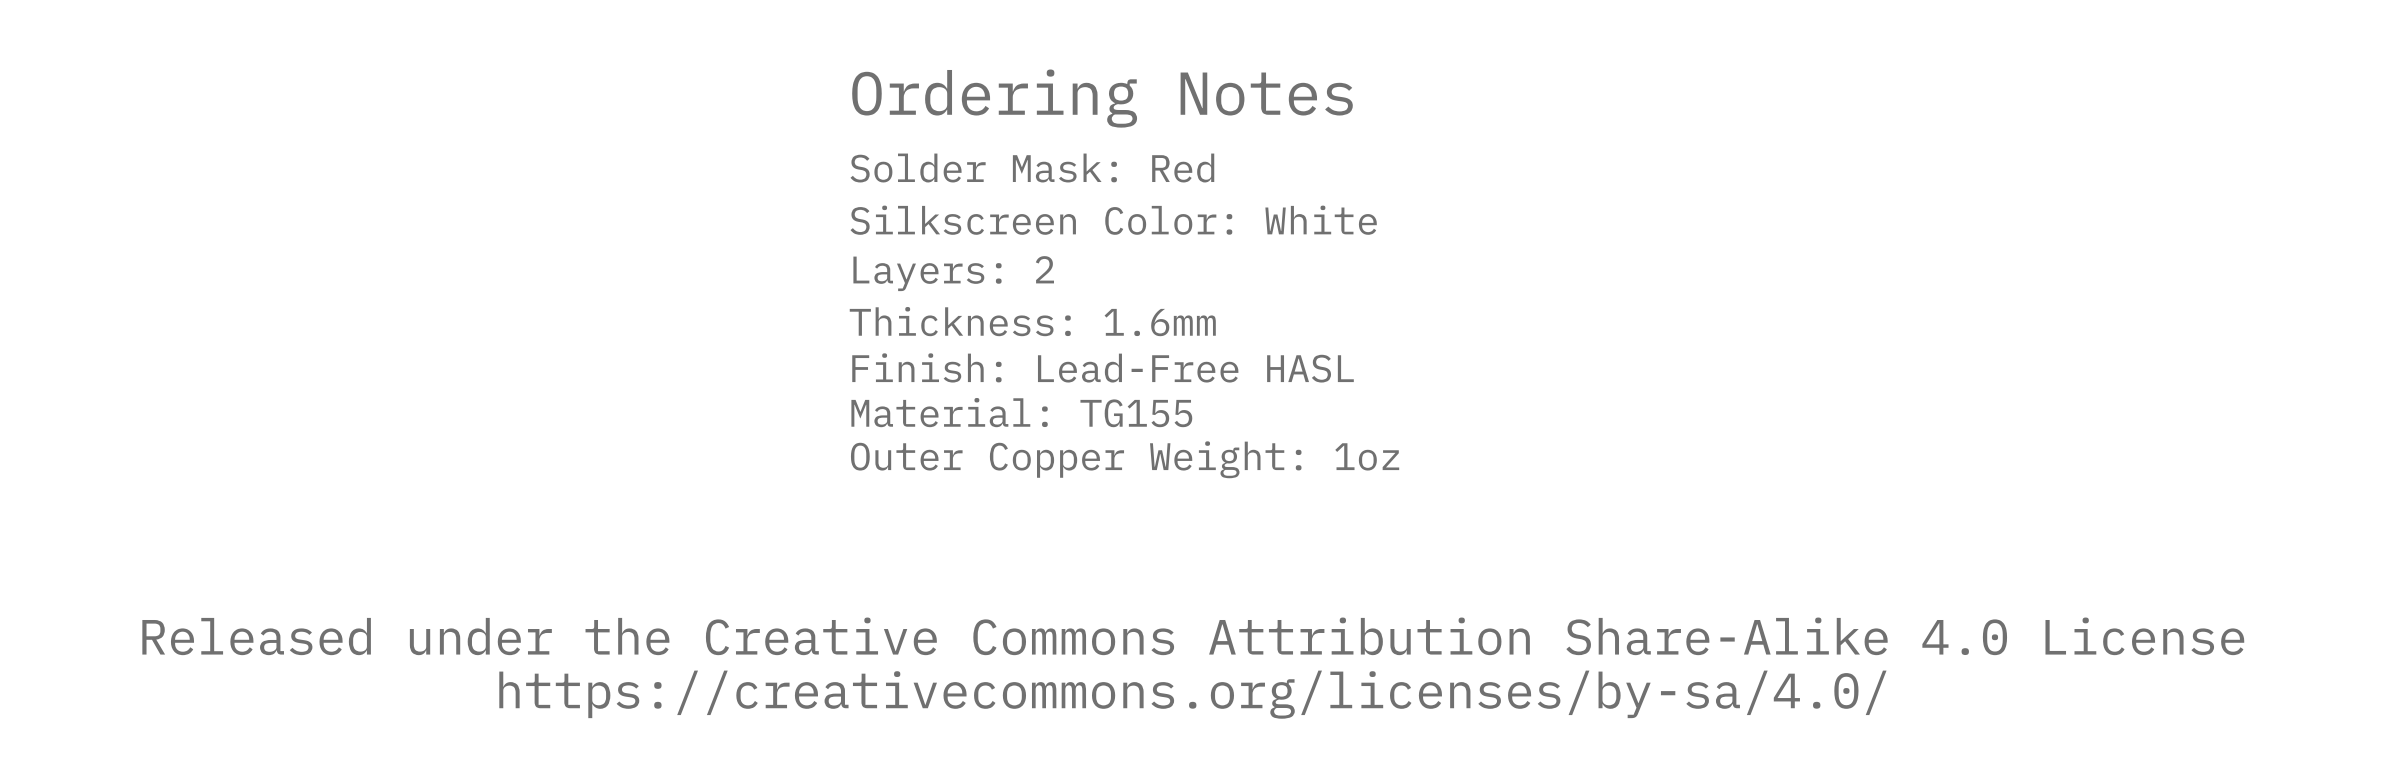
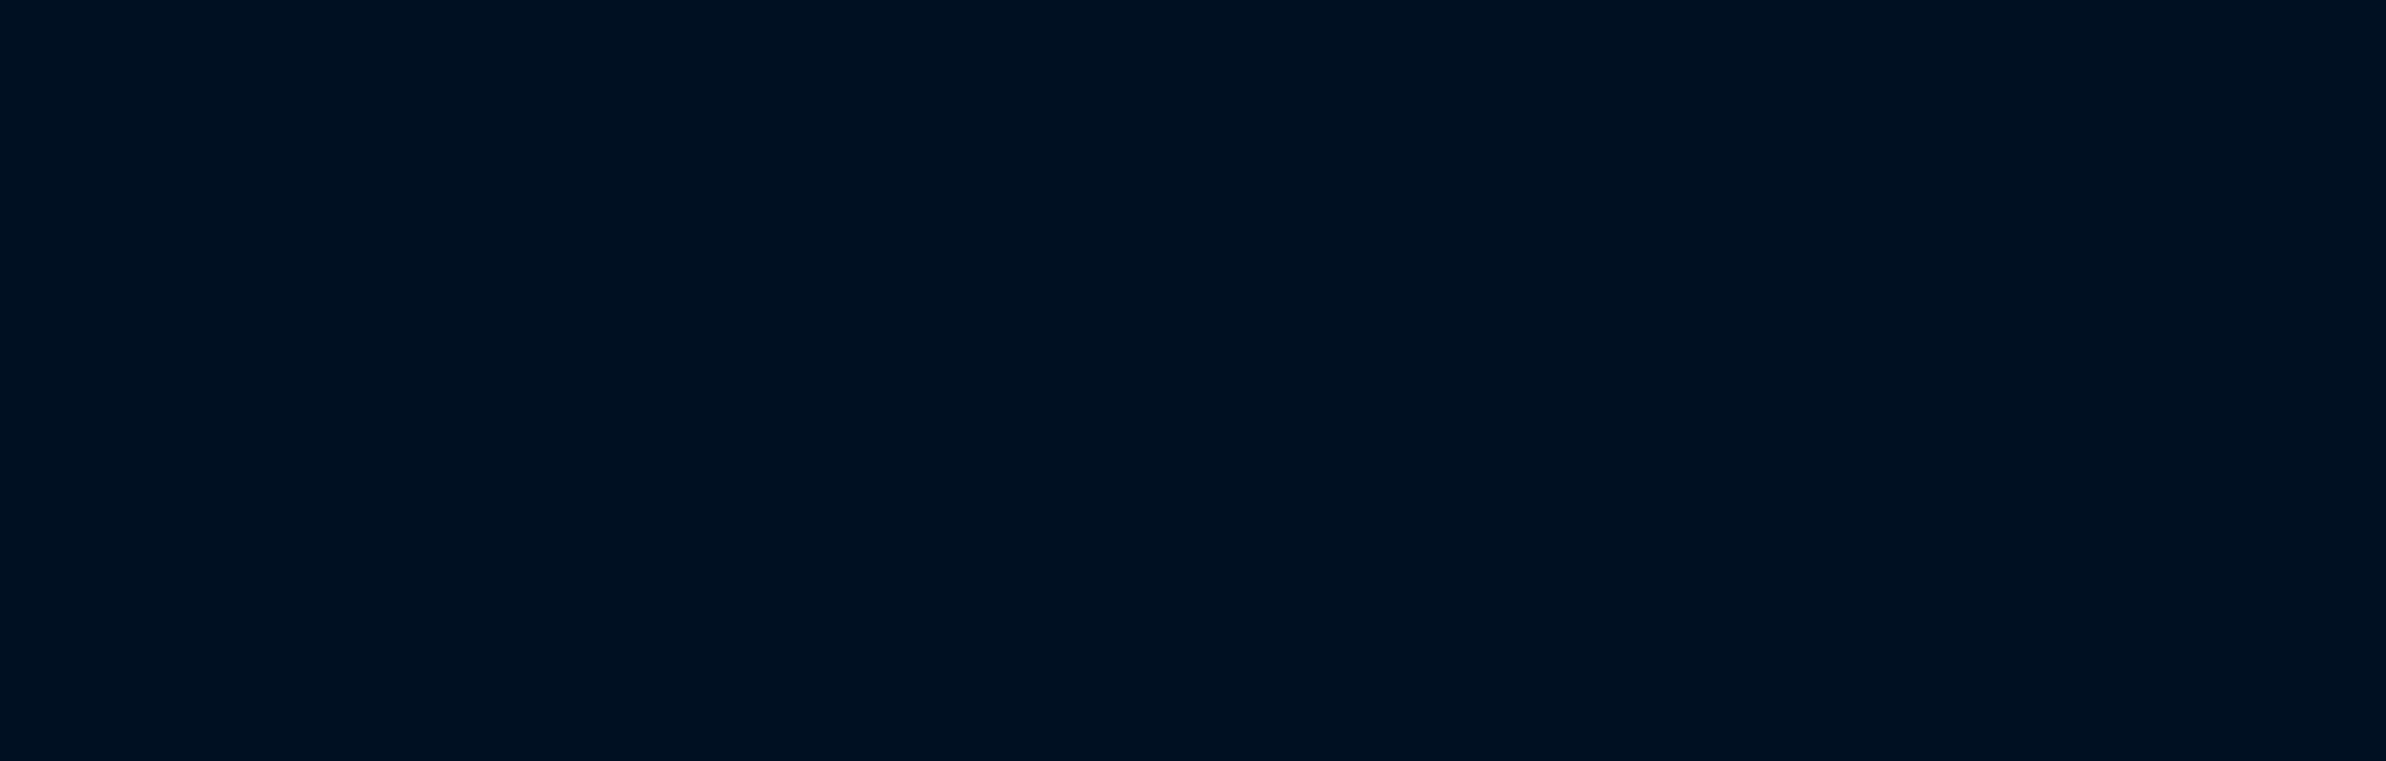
text: Ordering Notes (1102, 98) -> none
text: Solder Mask: Red (1032, 168) -> none
text: Silkscreen Color: White (1113, 220) -> none
text: Layers: 2 (953, 273) -> none
text: Thickness: 1.6mm (1032, 321) -> none
text: Finish: Lead-Free HASL (1103, 367) -> none
text: Material: TG155 (1021, 412) -> none
text: Outer Copper Weight: 1oz (1125, 459) -> none
drawing: [142, 617, 2245, 719] -> none

